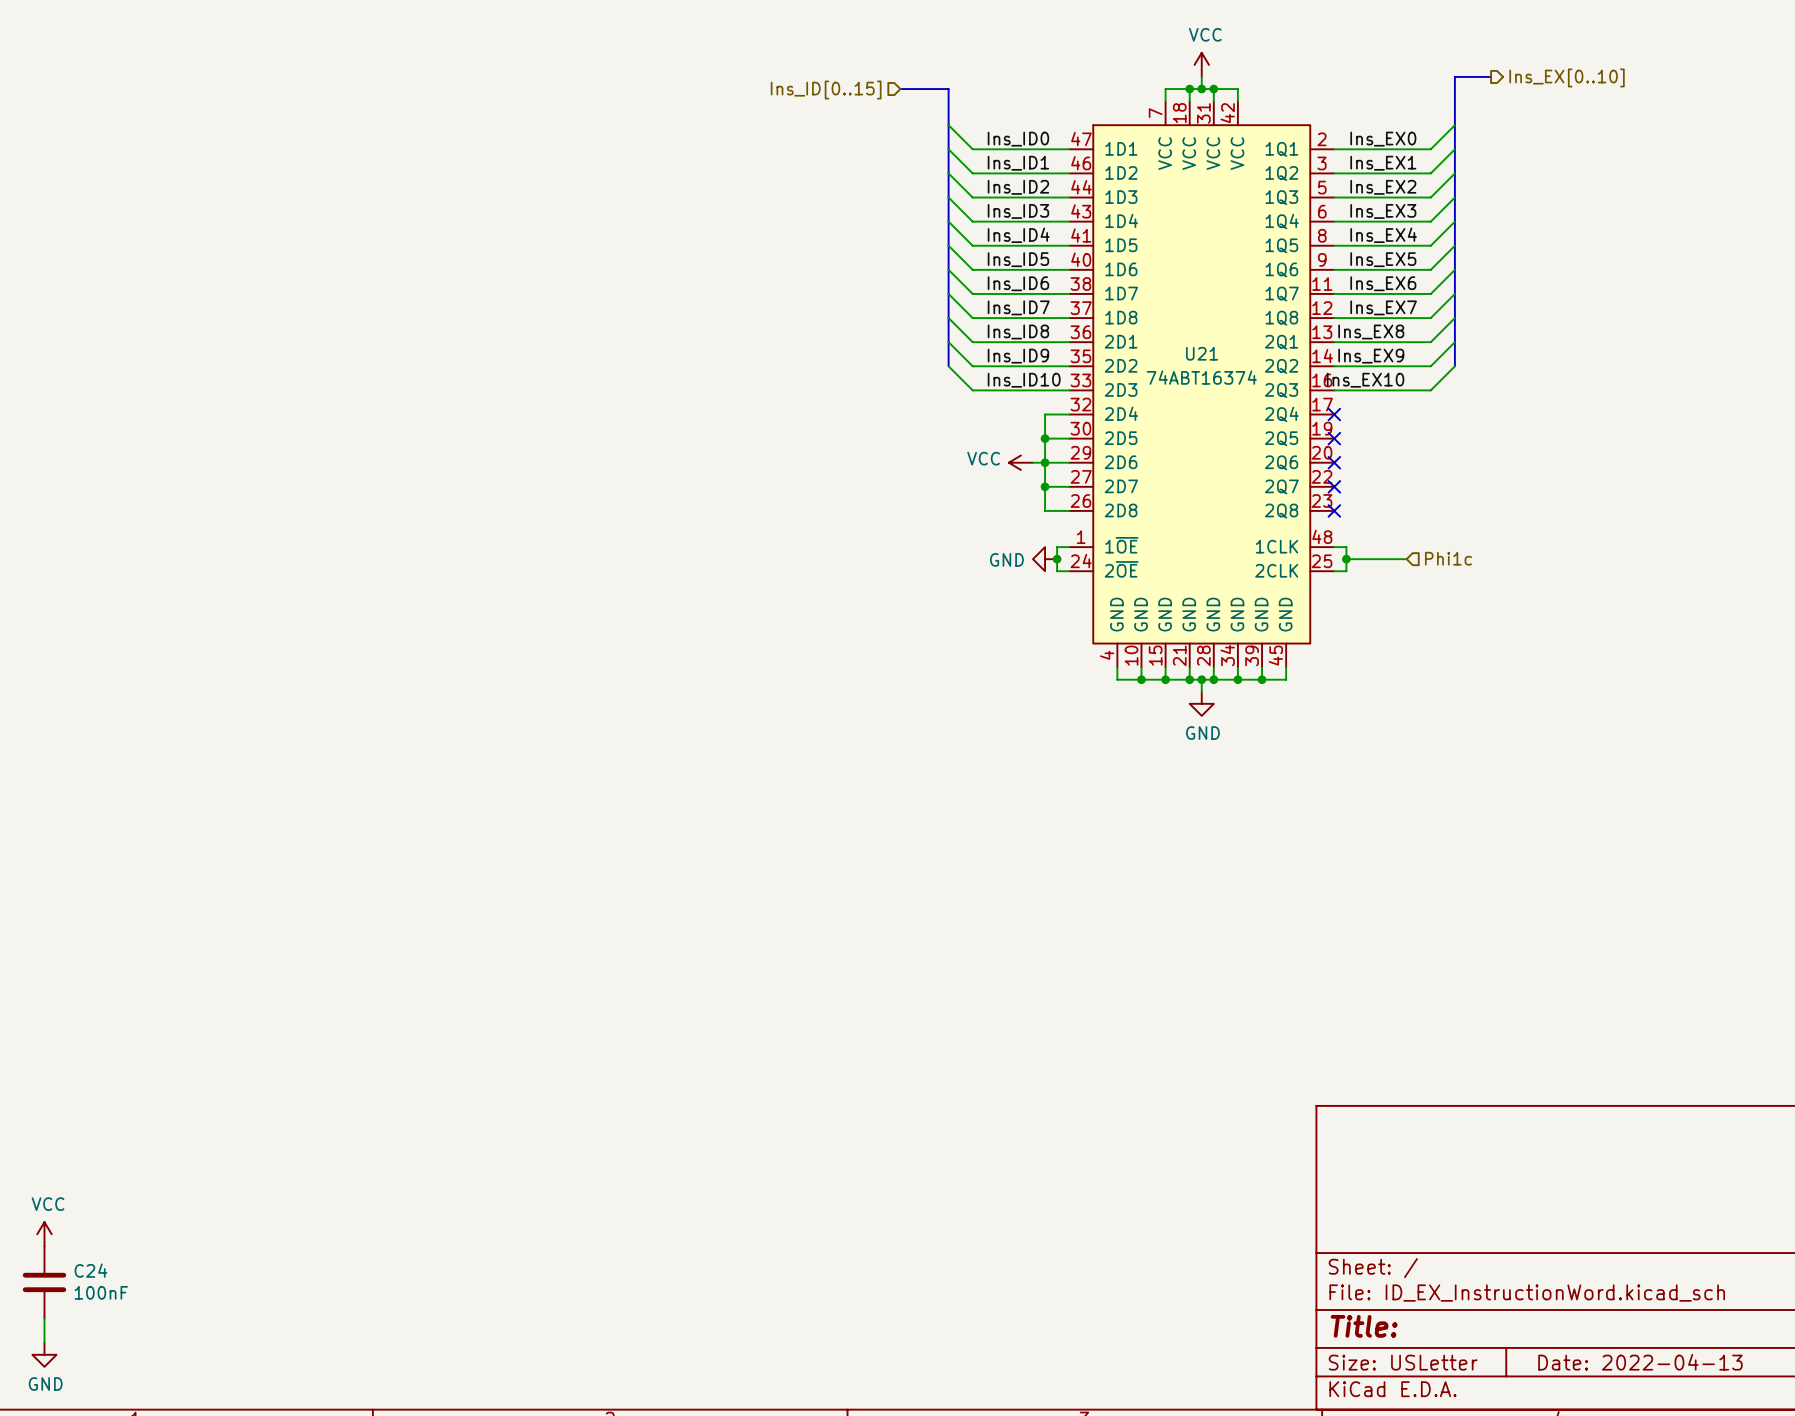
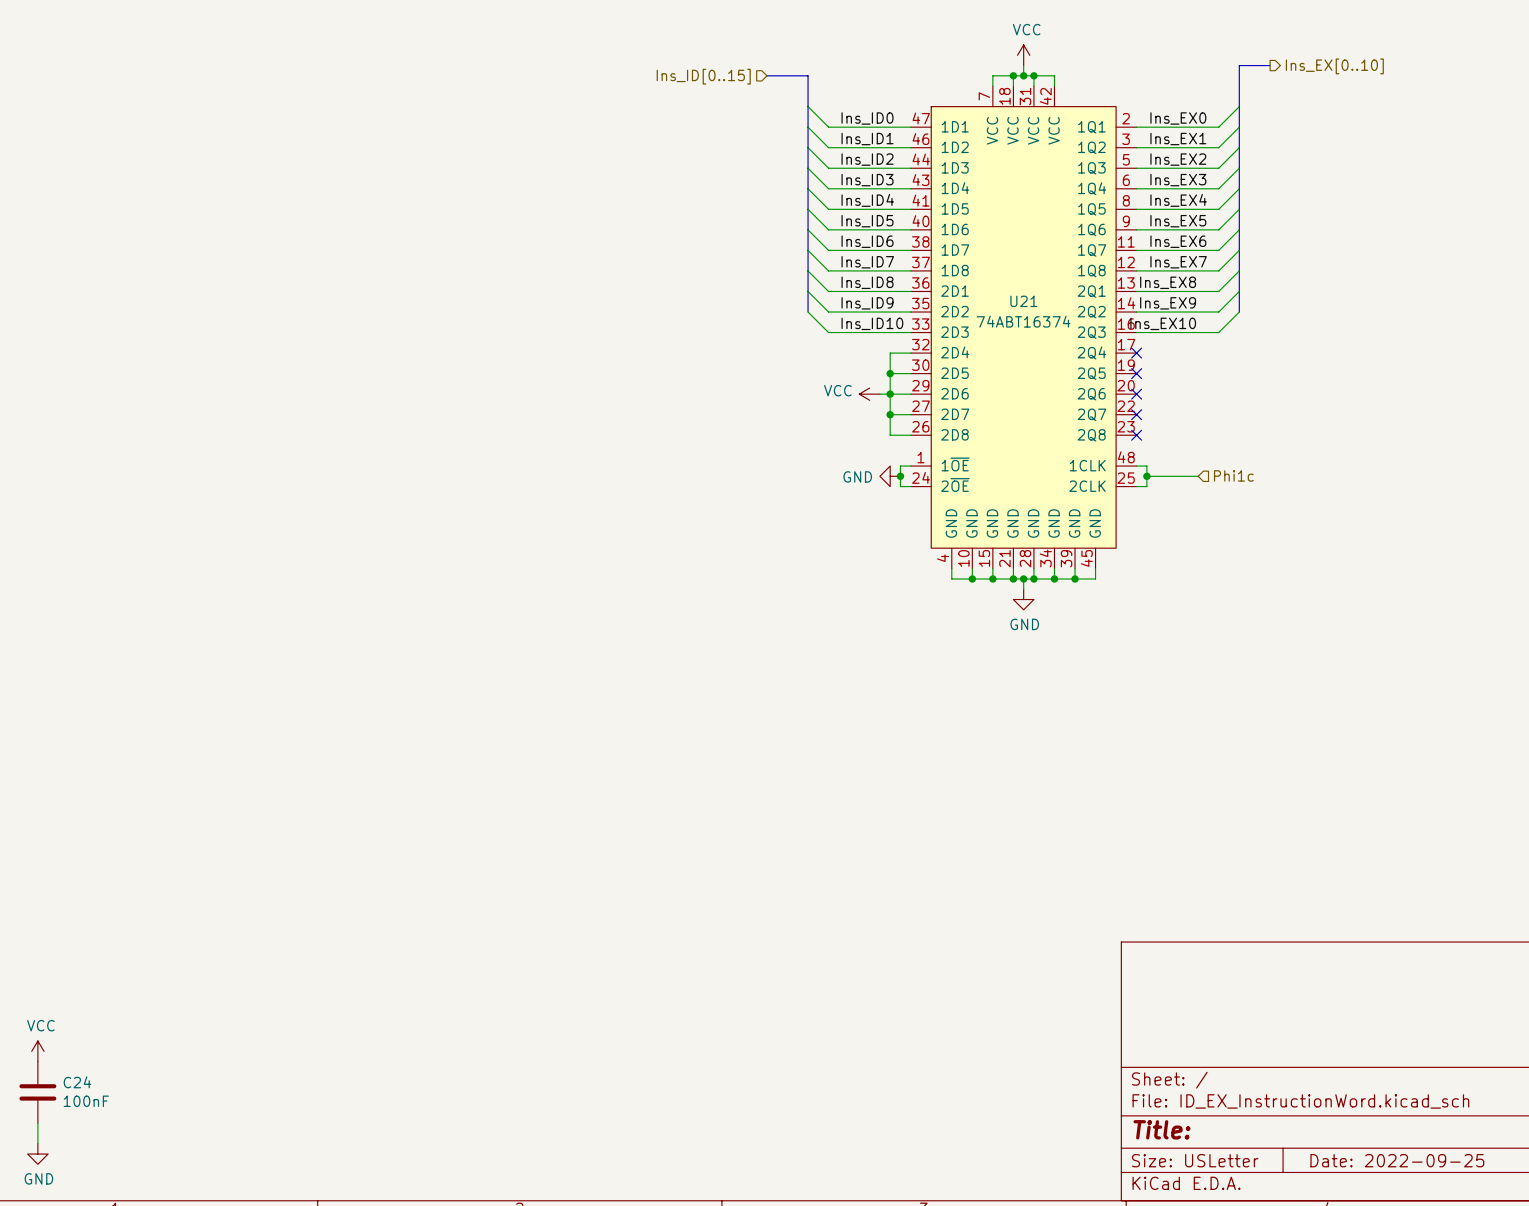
title block: Date: 2022-04-13 (1640, 1362) -> Date: 2022-09-25 (1397, 1160)

